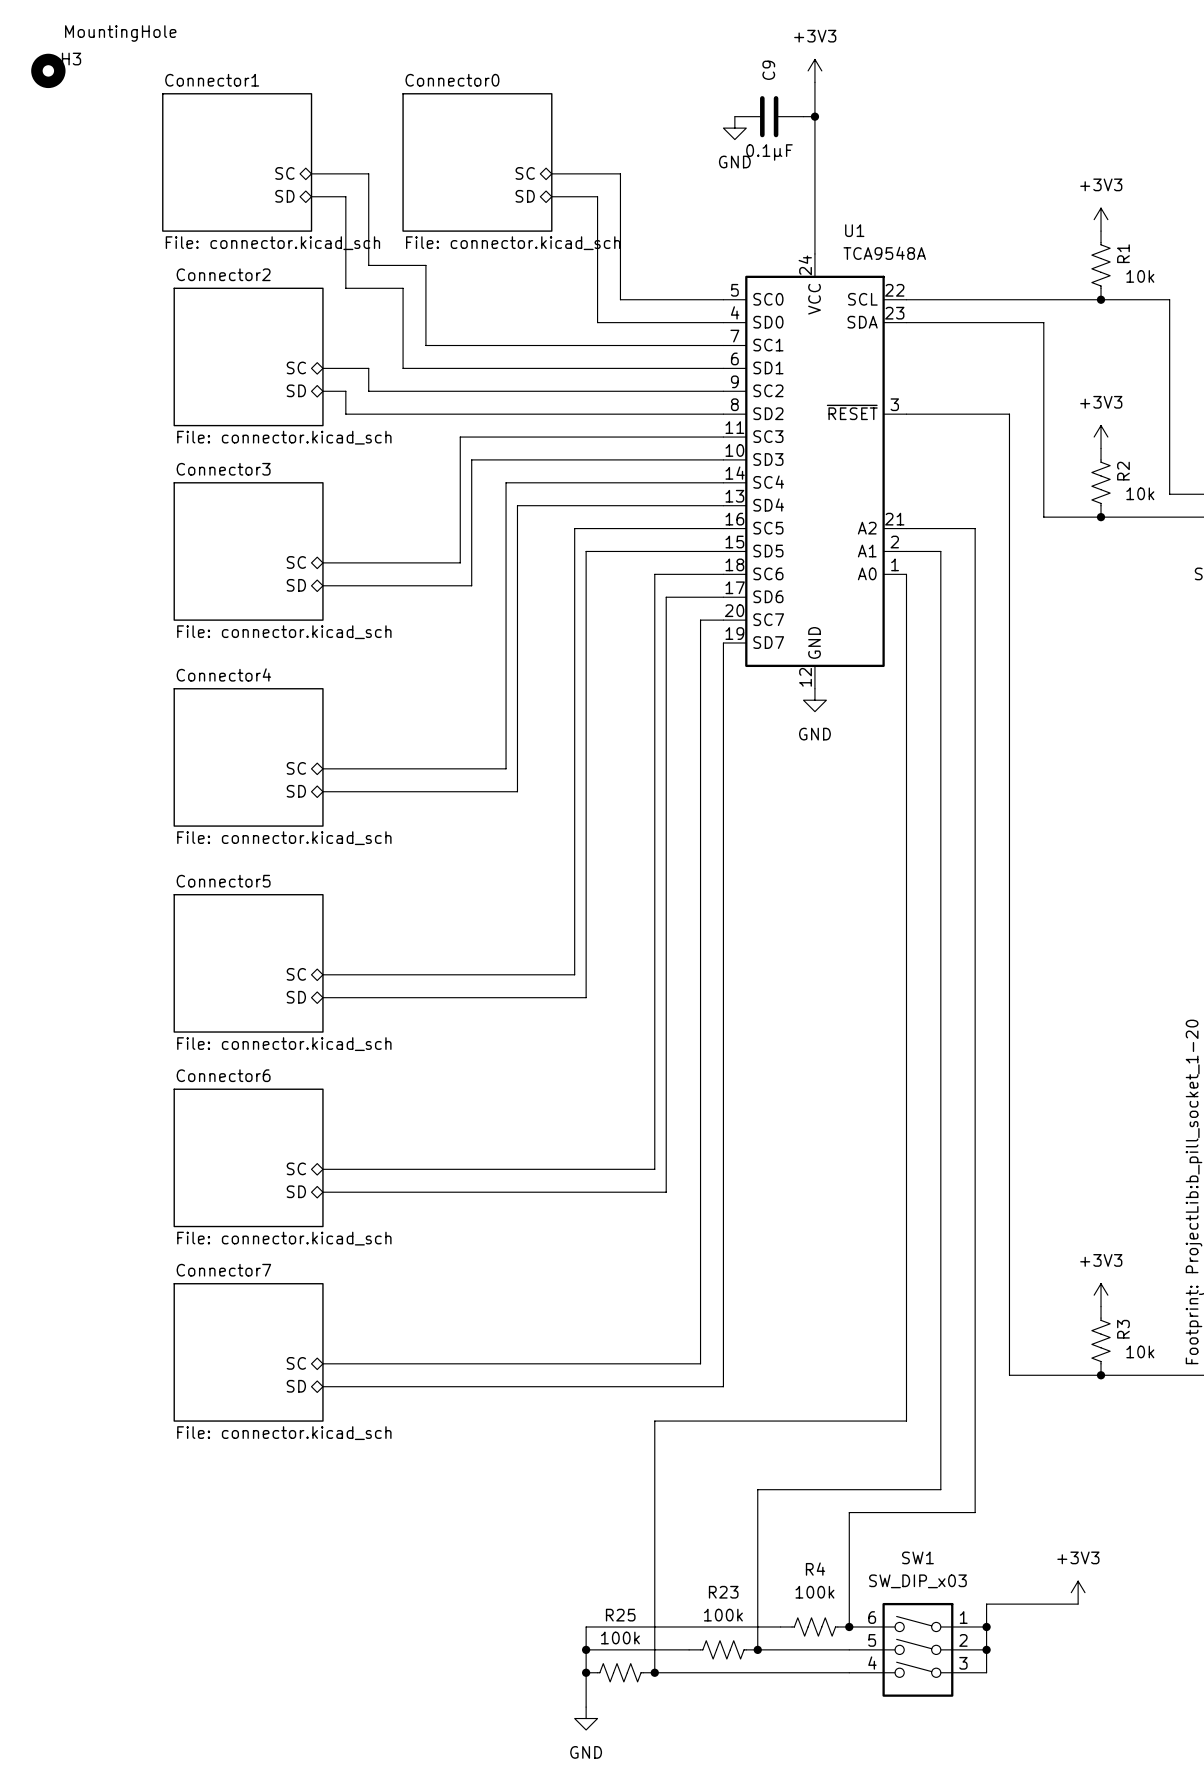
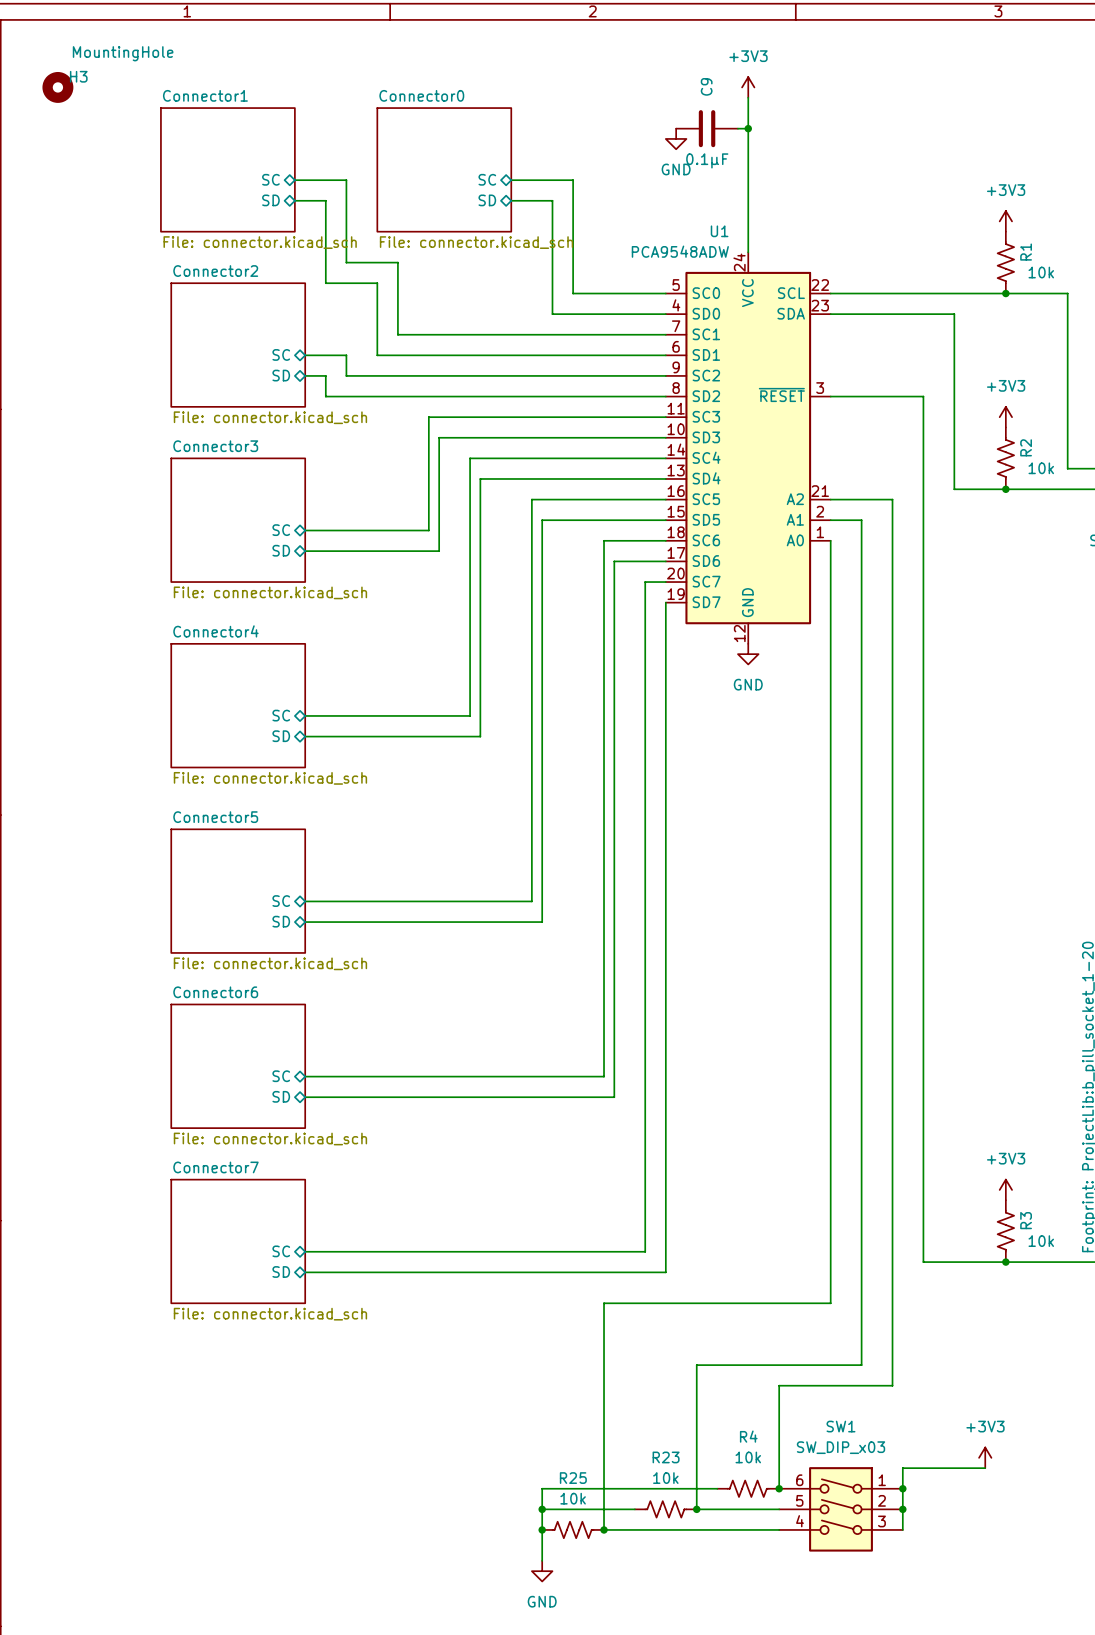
U1 name position: U1 (854, 230) -> U1 (719, 231)
U1 value: TCA9548A (884, 253) -> PCA9548ADW (680, 251)
R4 value: 100k (814, 1592) -> 10k (748, 1457)
R23 value: 100k (723, 1615) -> 10k (665, 1478)
R25 value: 100k (620, 1638) -> 10k (573, 1498)

